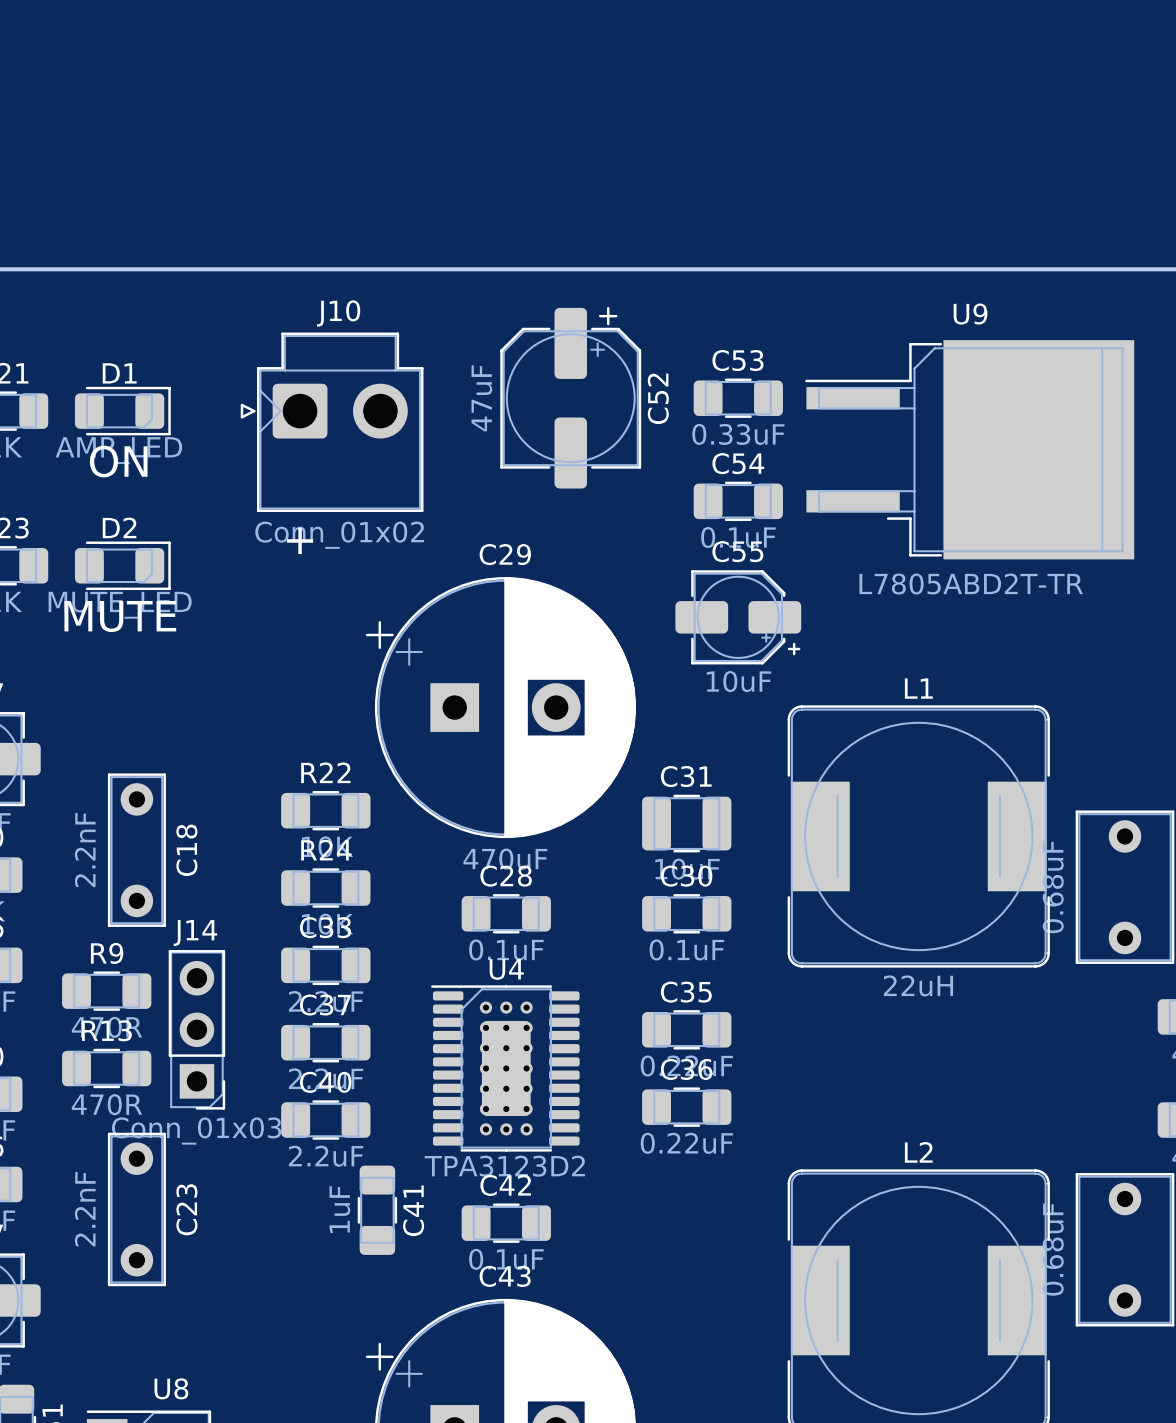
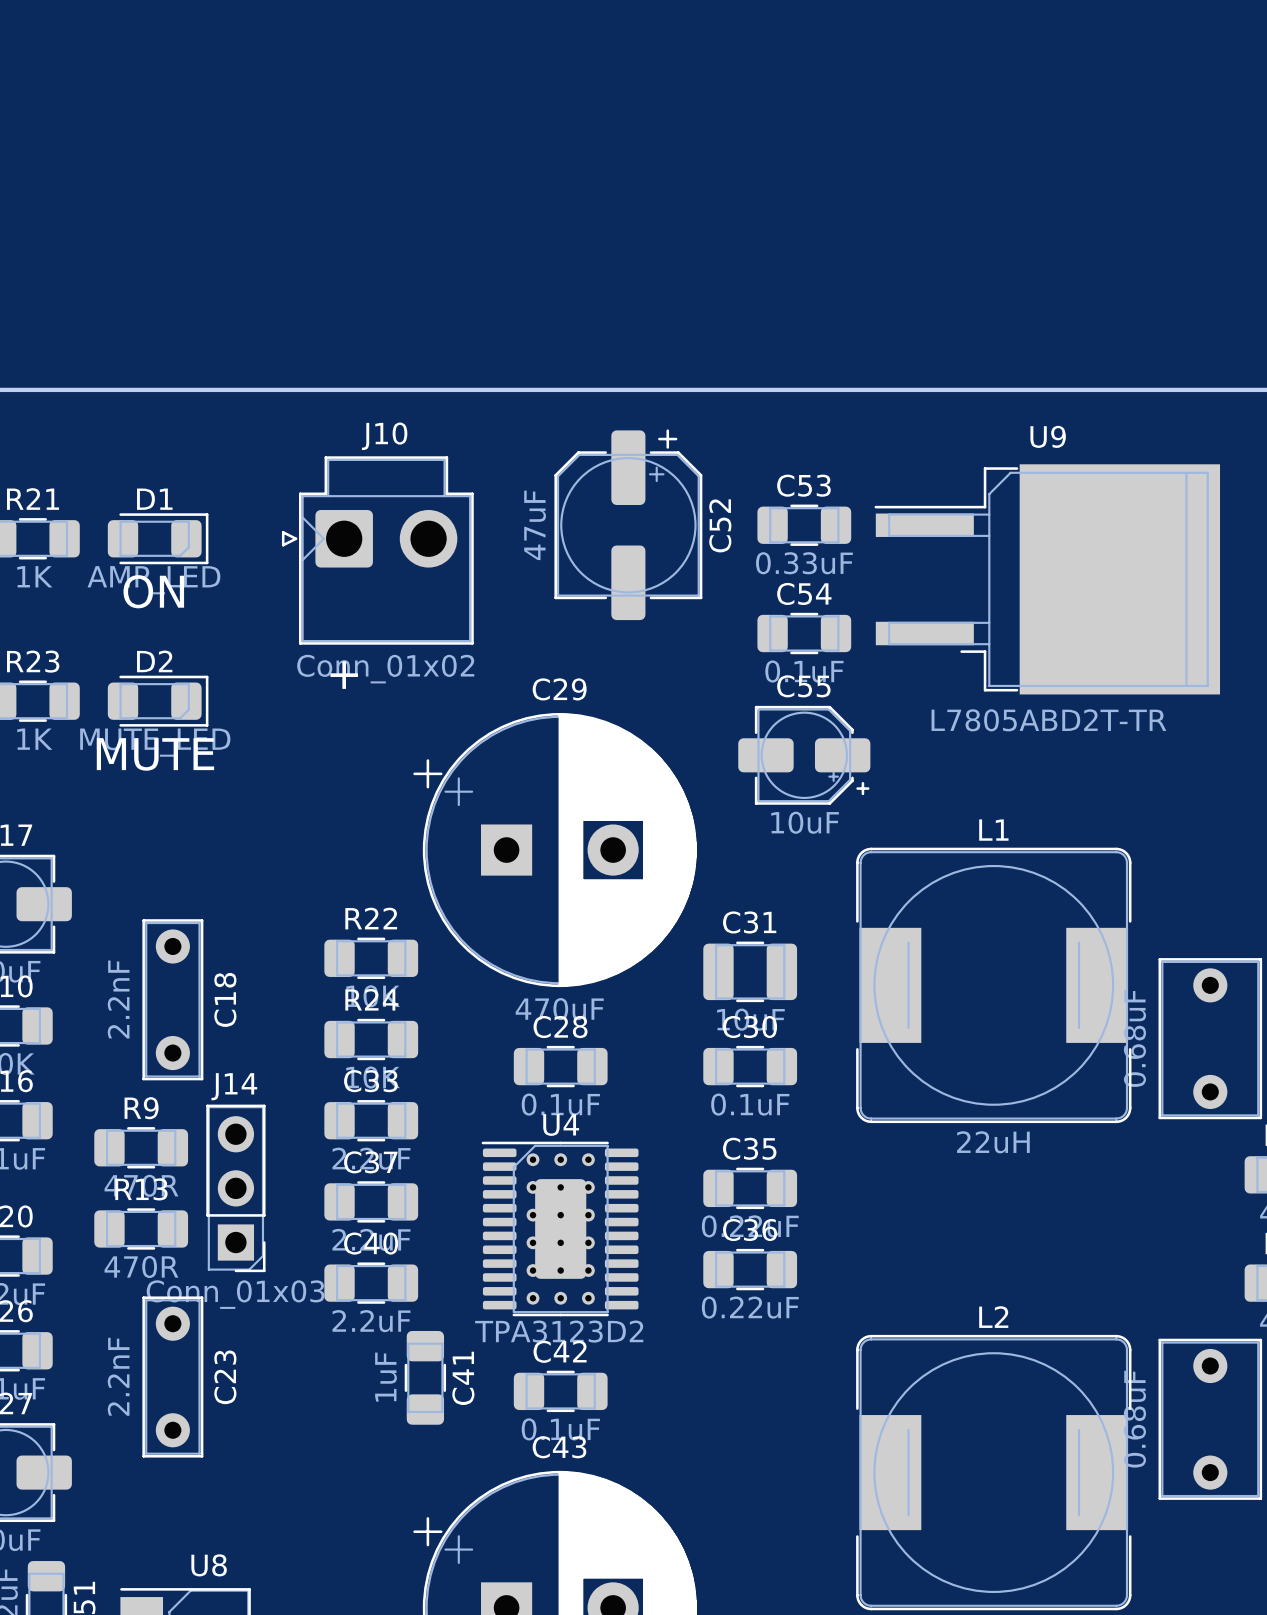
U4 footprint: [430, 985, 580, 1152] -> [481, 1141, 639, 1317]

